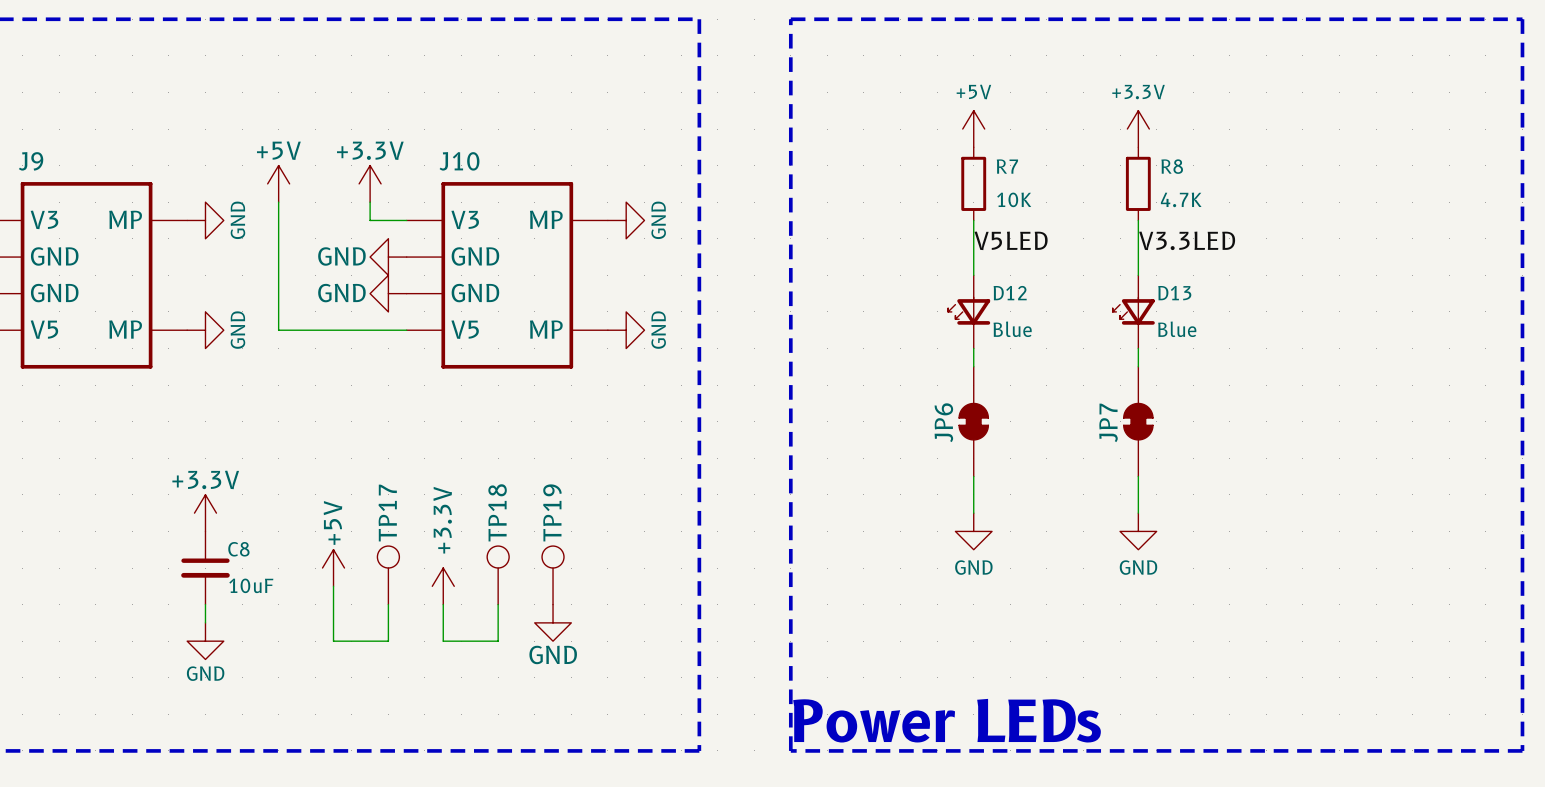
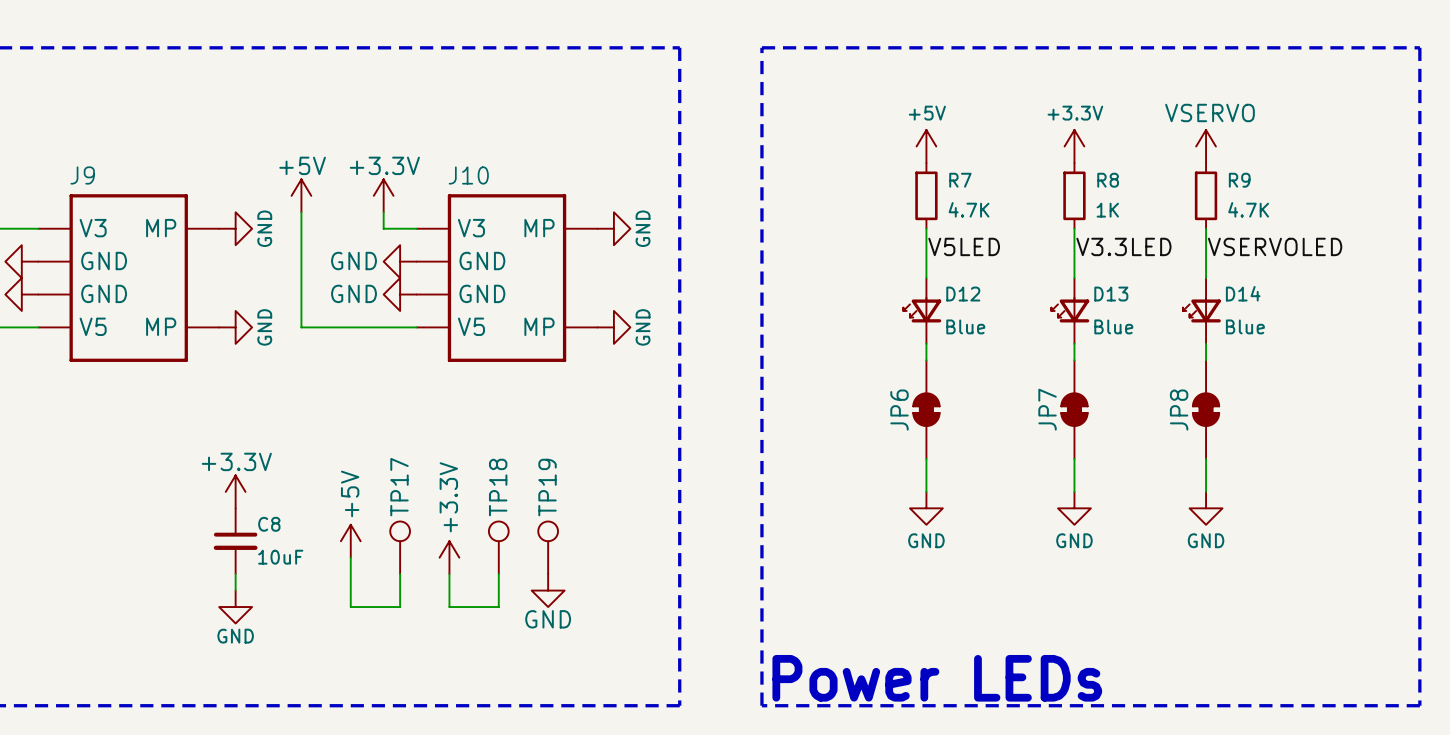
power symbol: none -> VSERVO (1206, 146)
R9: none -> 4.7K (1206, 195)
R7 value: 10K (1014, 199) -> 4.7K (969, 209)
R8 value: 4.7K (1181, 199) -> 1K (1107, 210)
wire: none -> (1206, 228) (1206, 278)
label: none -> VSERVOLED (1275, 246)
D14: none -> Blue (1201, 310)
wire: none -> (1206, 343) (1206, 360)
JP8: none -> (1206, 409)
wire: none -> (1206, 458) (1206, 491)
power symbol: none -> GND (1206, 508)

